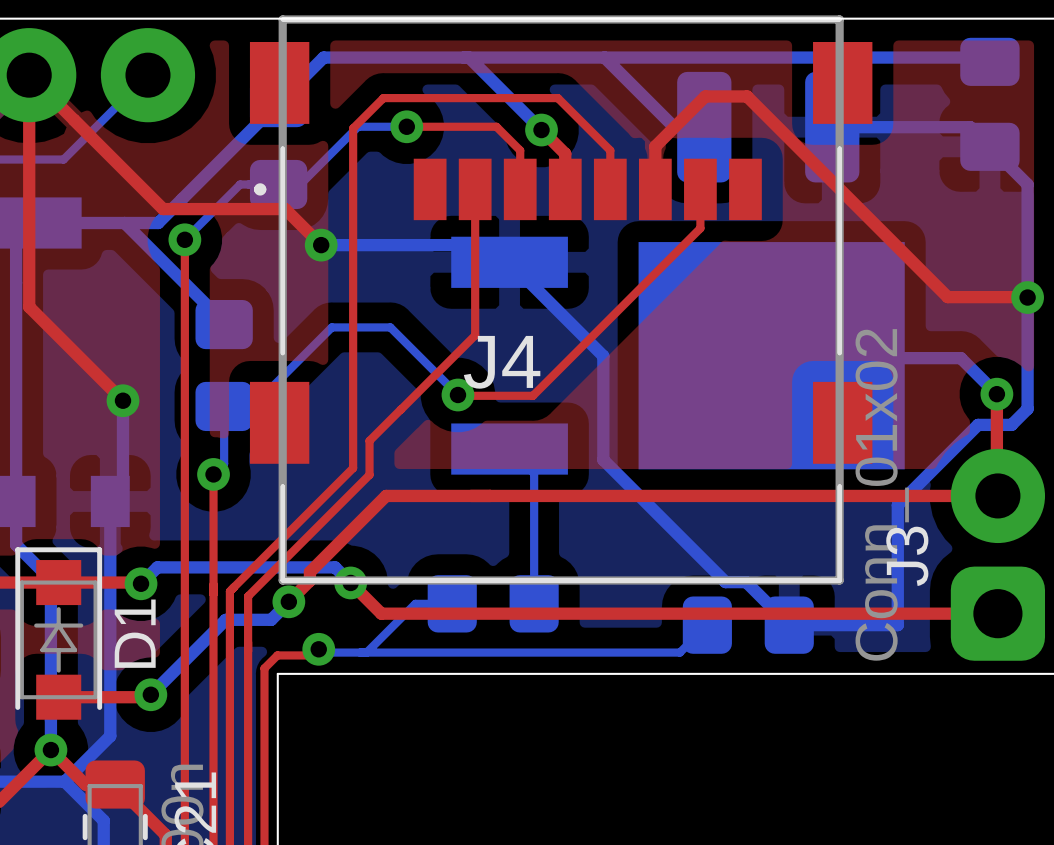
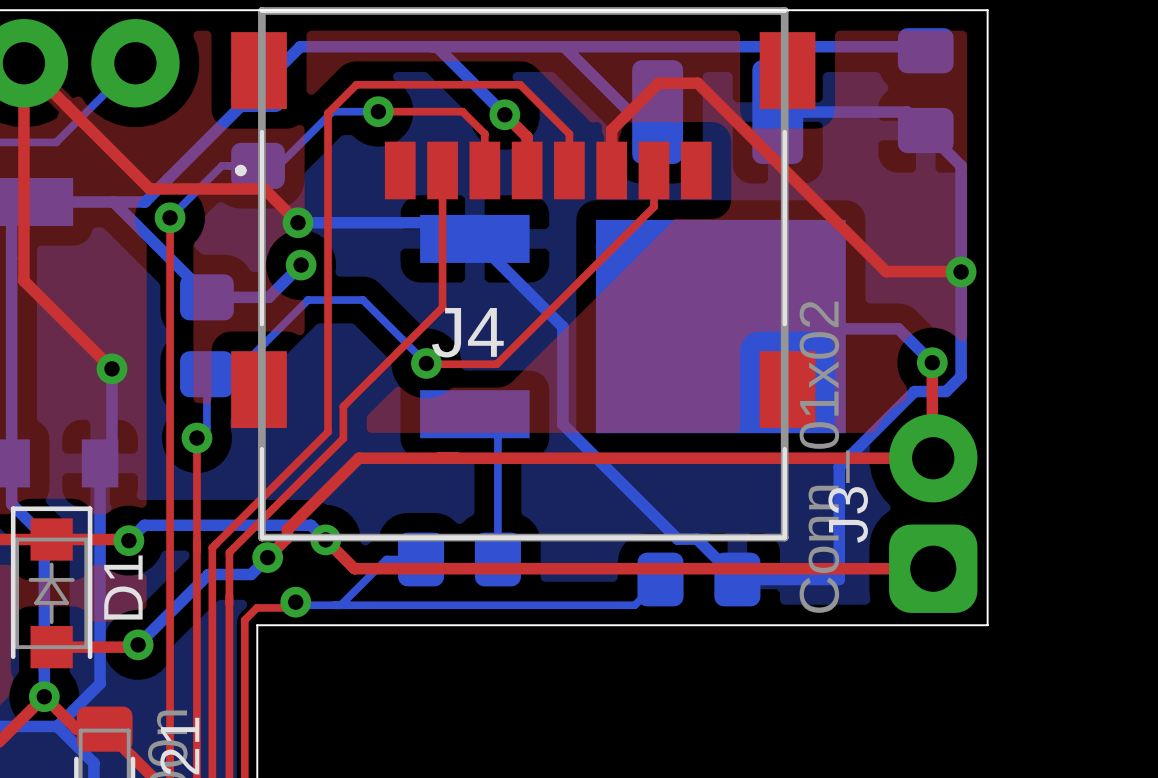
bottom track: none -> (301, 265) (268, 297) (206, 297)
via: none -> (301, 265)

